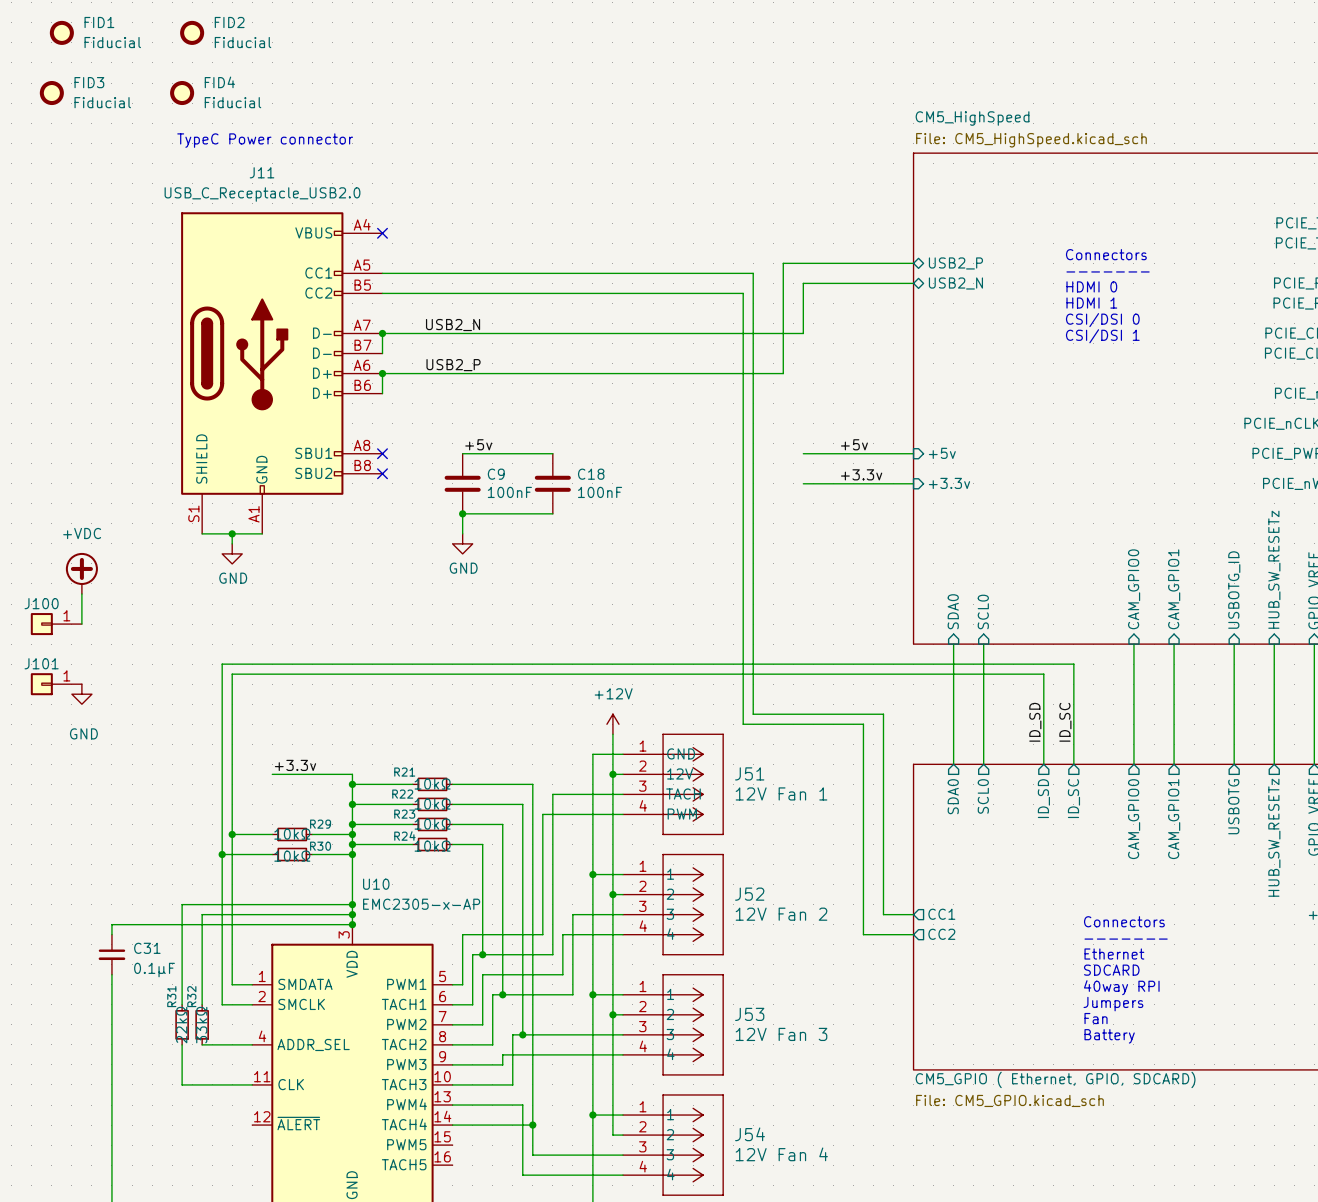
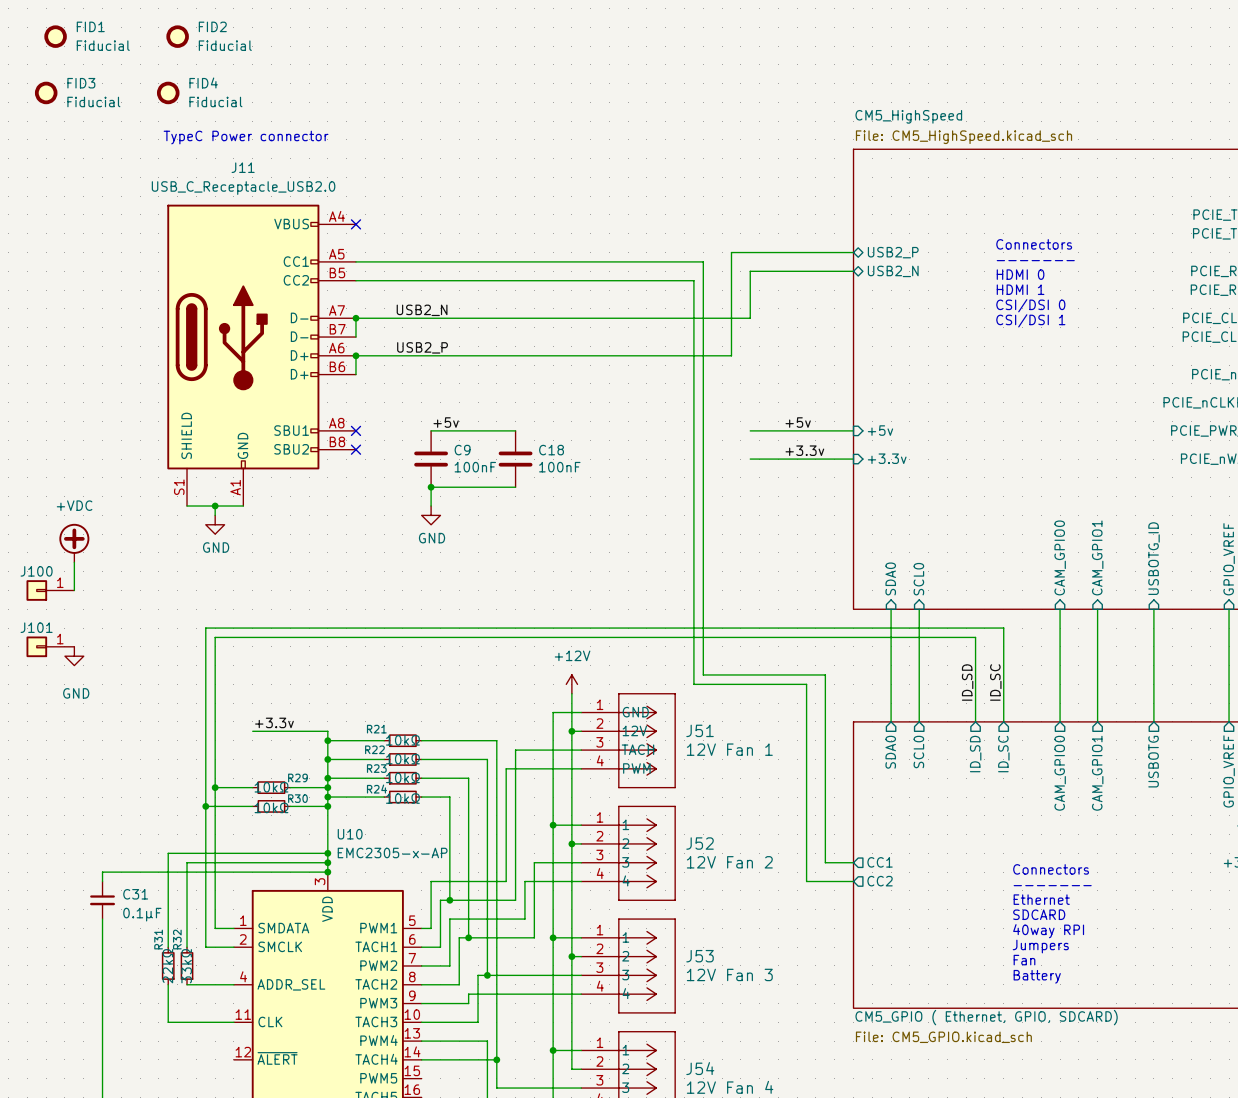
sheet pin: HUB_SW_RESETz (1274, 569) -> none
wire: (1274, 644) (1274, 764) -> none
sheet pin: HUB_SW_RESETz (1274, 837) -> none

